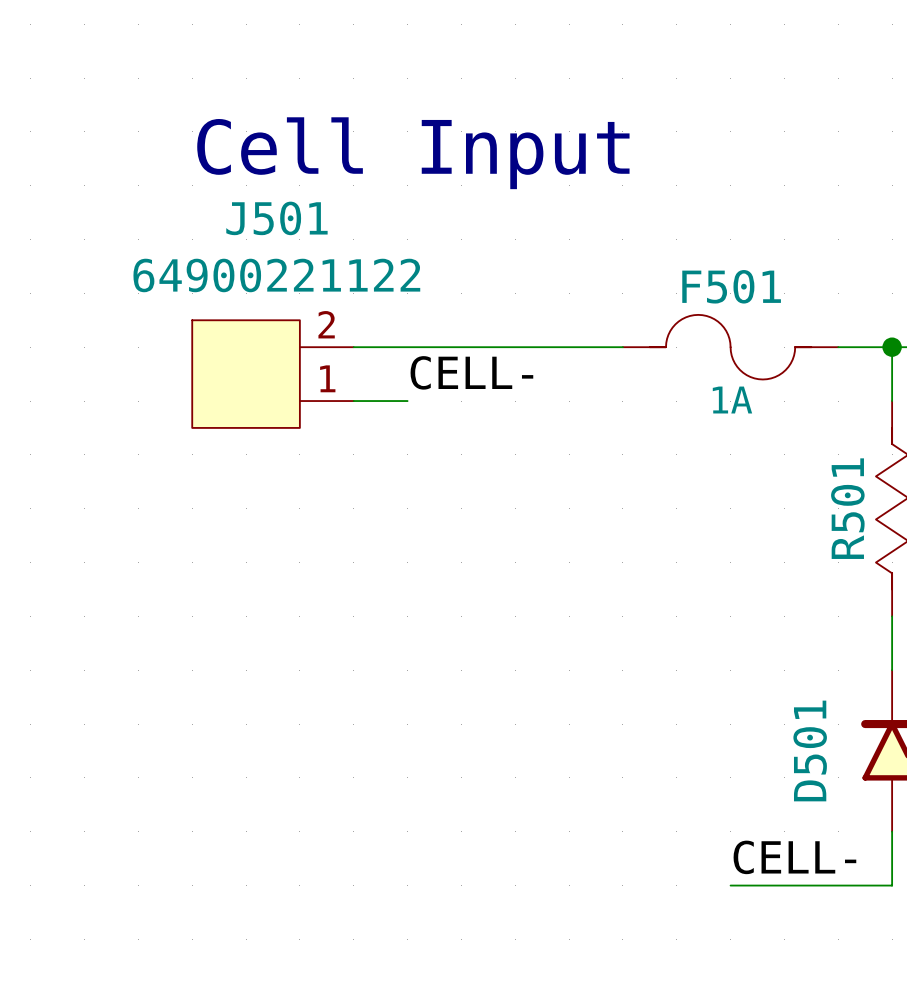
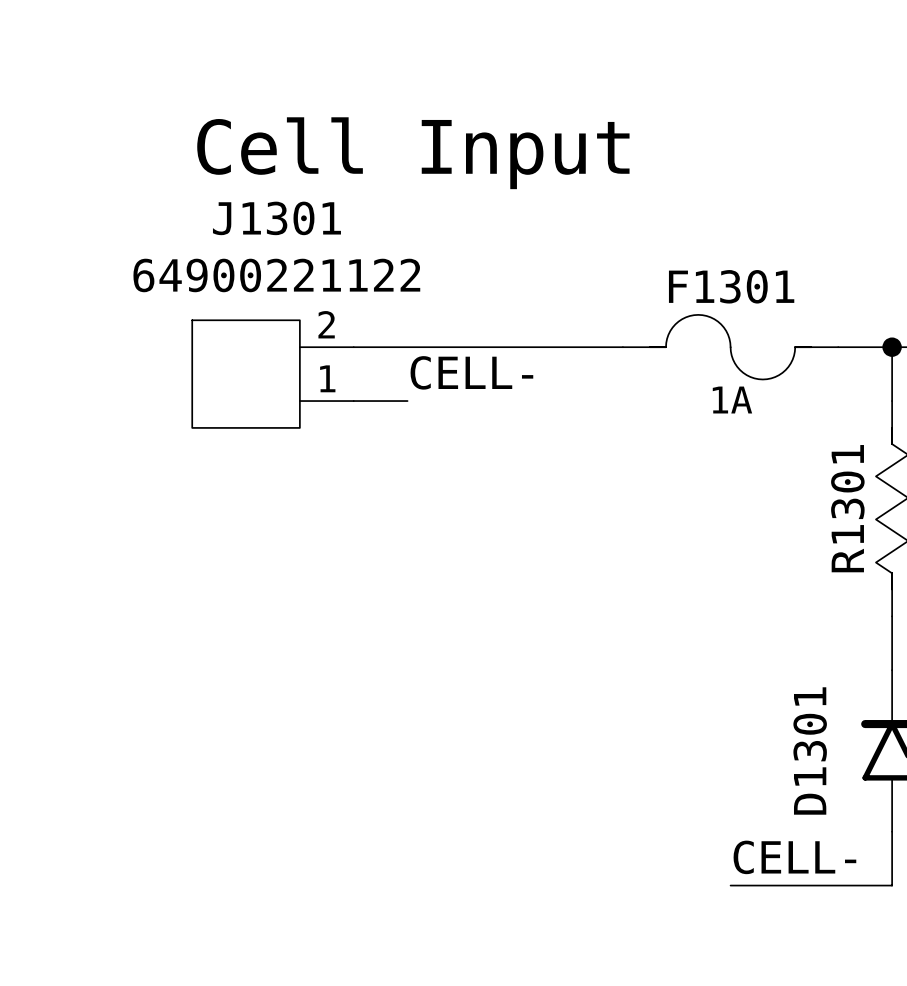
J501 name: J501 (276, 218) -> J1301 (276, 218)
F501 name: F501 (731, 286) -> F1301 (731, 286)
R501 name: R501 (847, 508) -> R1301 (847, 508)
D501 name: D501 (810, 750) -> D1301 (810, 750)

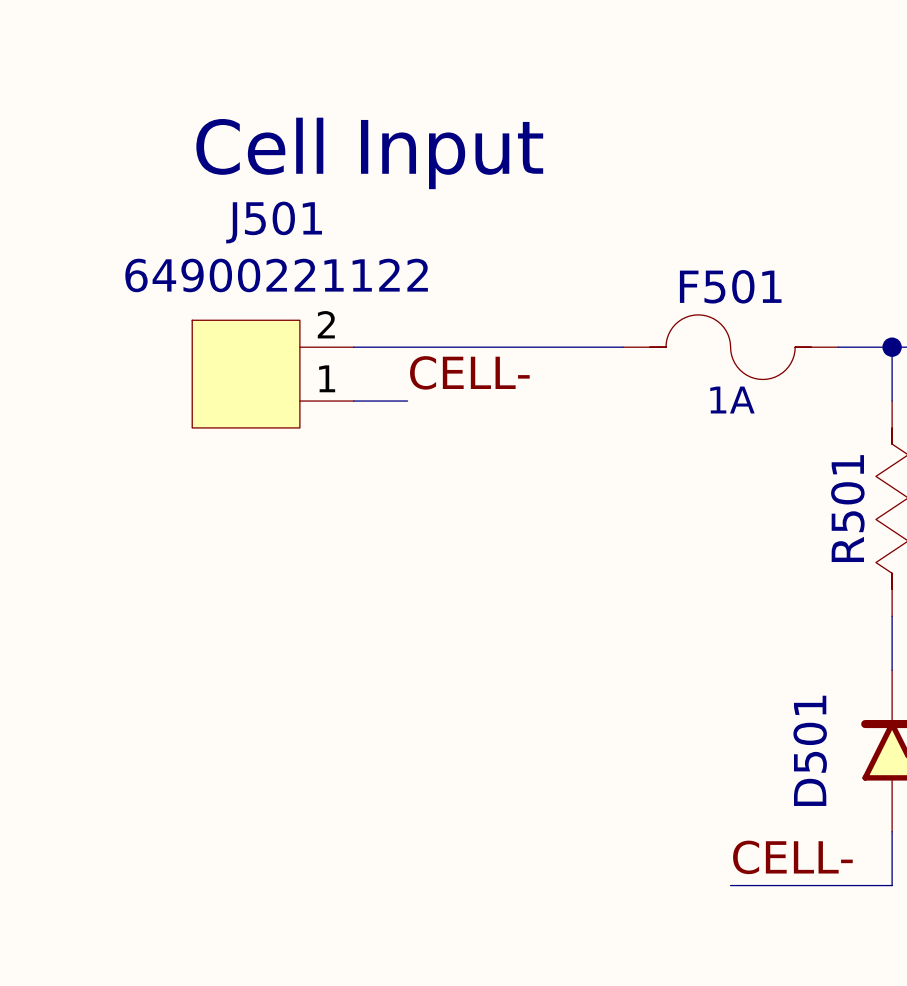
J1301 name: J1301 (276, 218) -> J501 (274, 222)
F1301 name: F1301 (731, 286) -> F501 (730, 286)
R1301 name: R1301 (847, 508) -> R501 (847, 508)
D1301 name: D1301 (810, 750) -> D501 (810, 750)

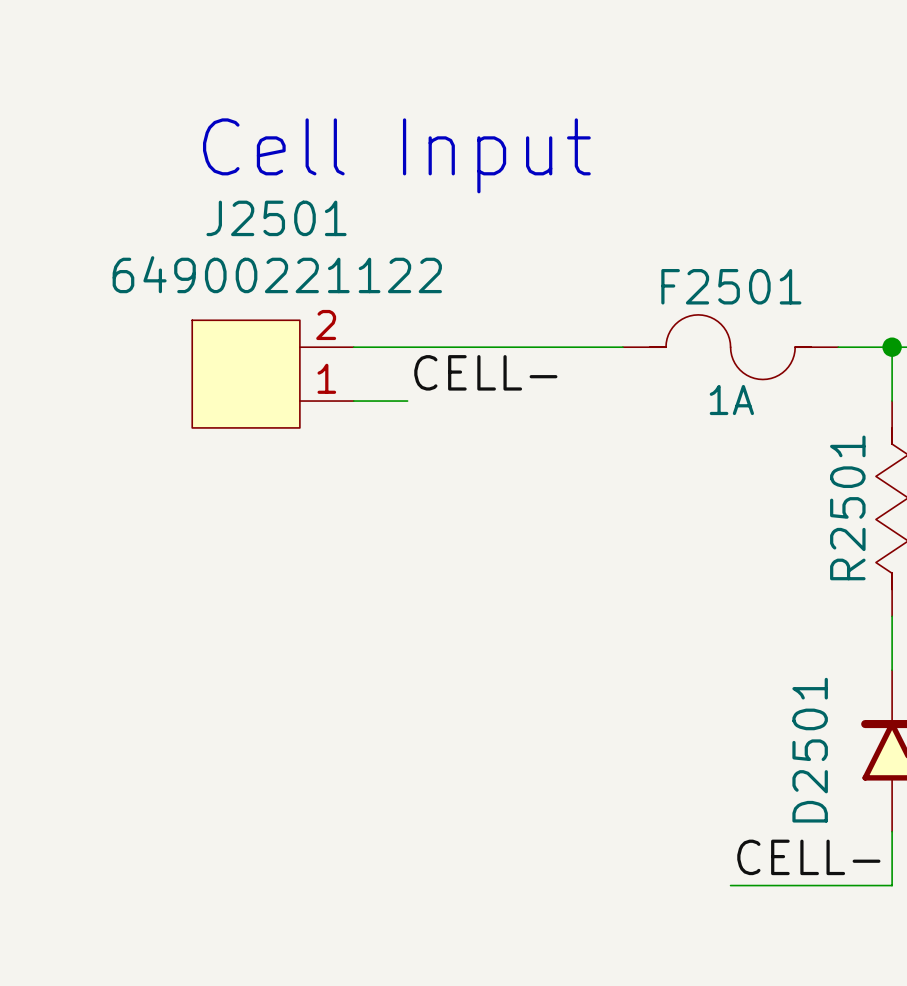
J501 name: J501 (274, 222) -> J2501 (276, 218)
F501 name: F501 (730, 286) -> F2501 (731, 286)
R501 name: R501 (847, 508) -> R2501 (847, 507)
D501 name: D501 (810, 750) -> D2501 (810, 750)

